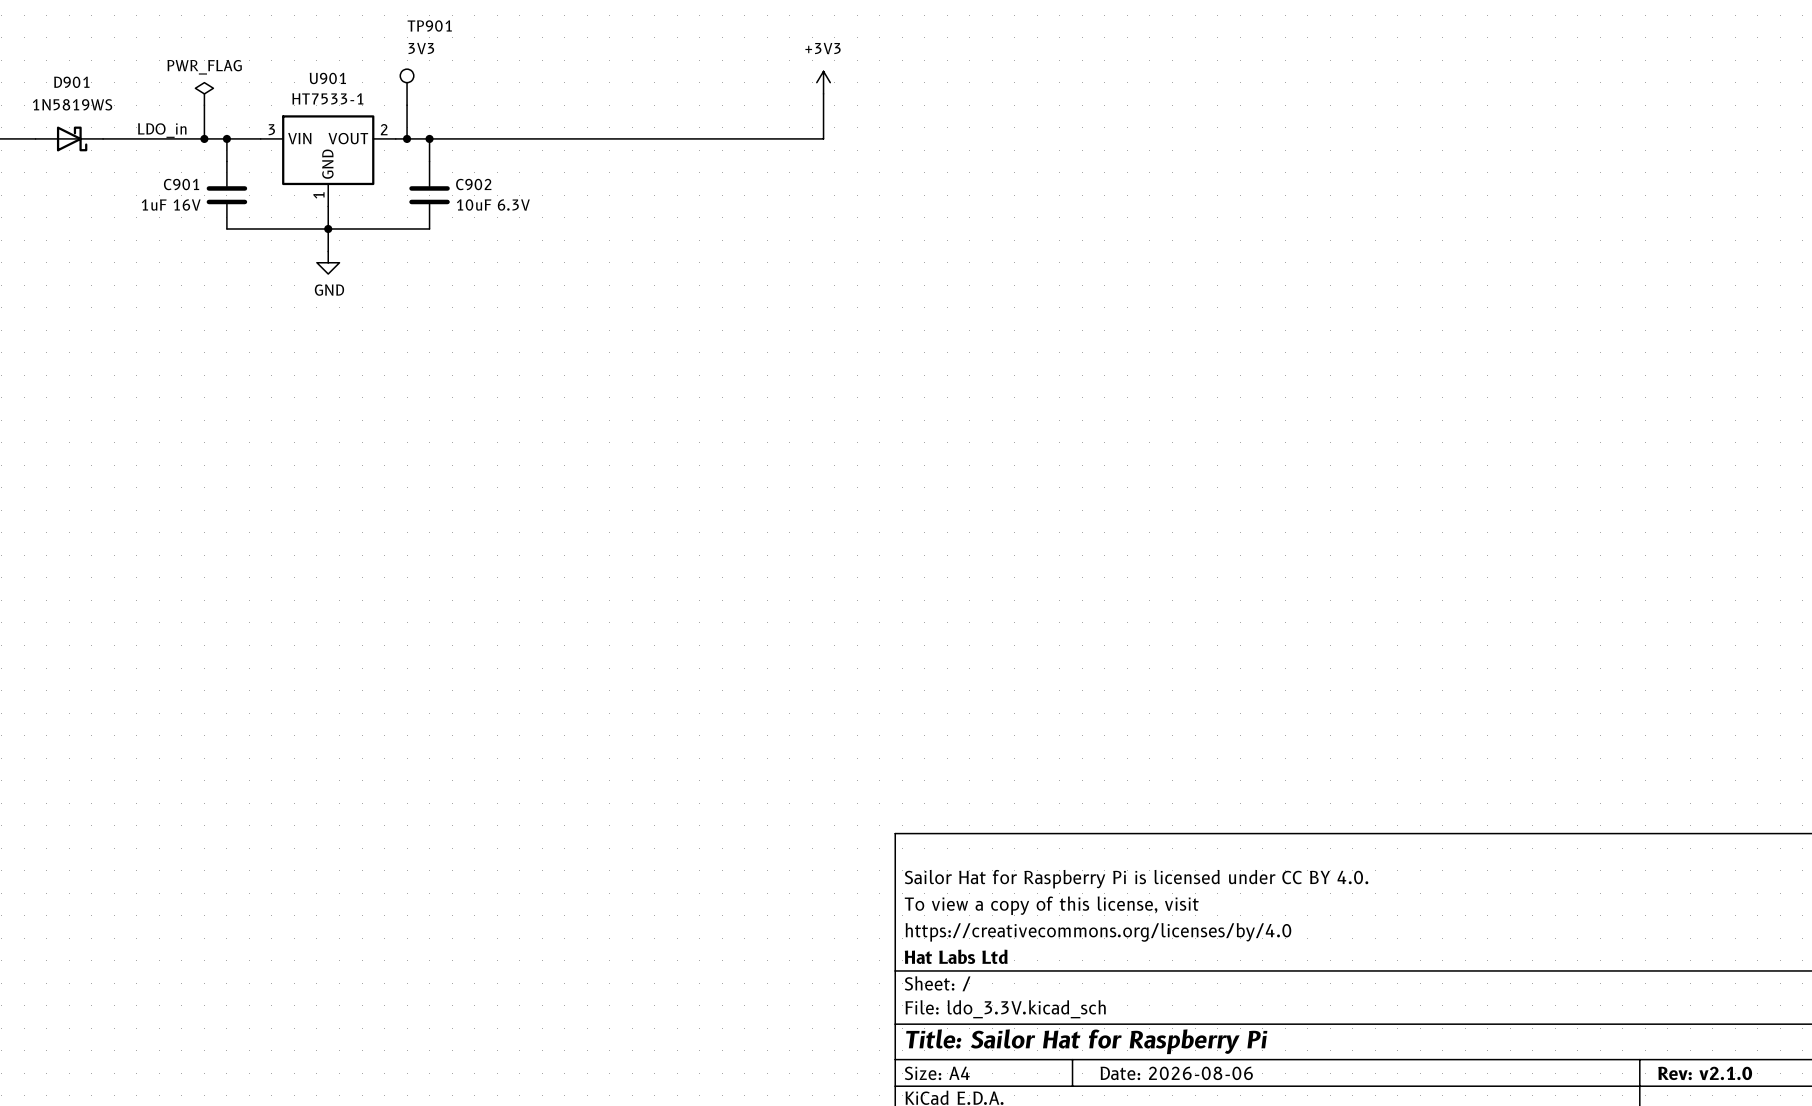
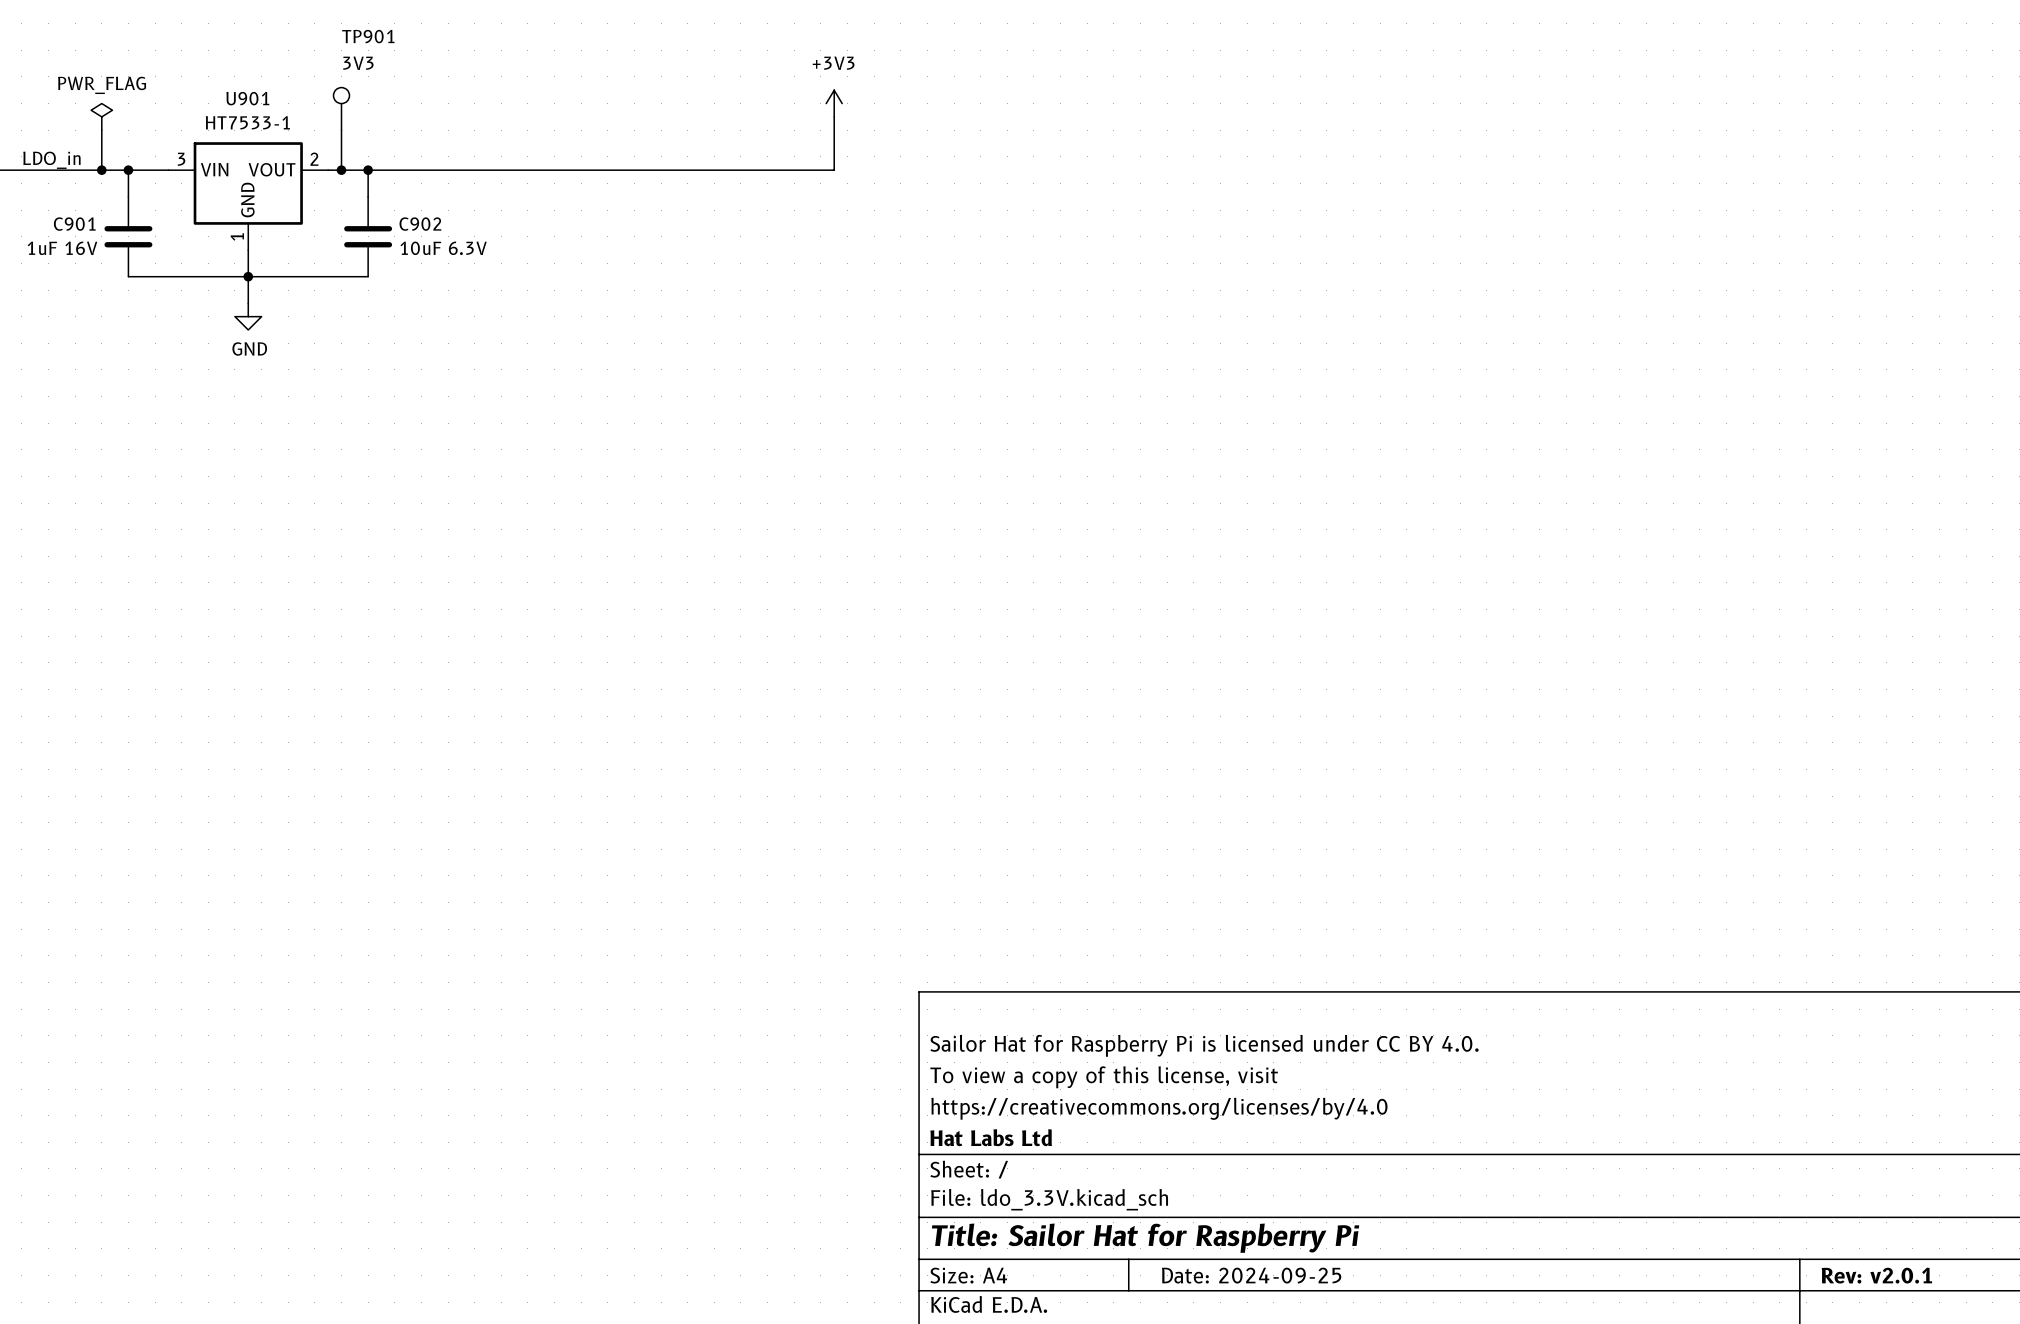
title block: Date: 2026-08-06 (1176, 1073) -> Date: 2024-09-25 (1251, 1275)
title block: Rev: v2.1.0 (1705, 1073) -> Rev: v2.0.1 (1876, 1275)

